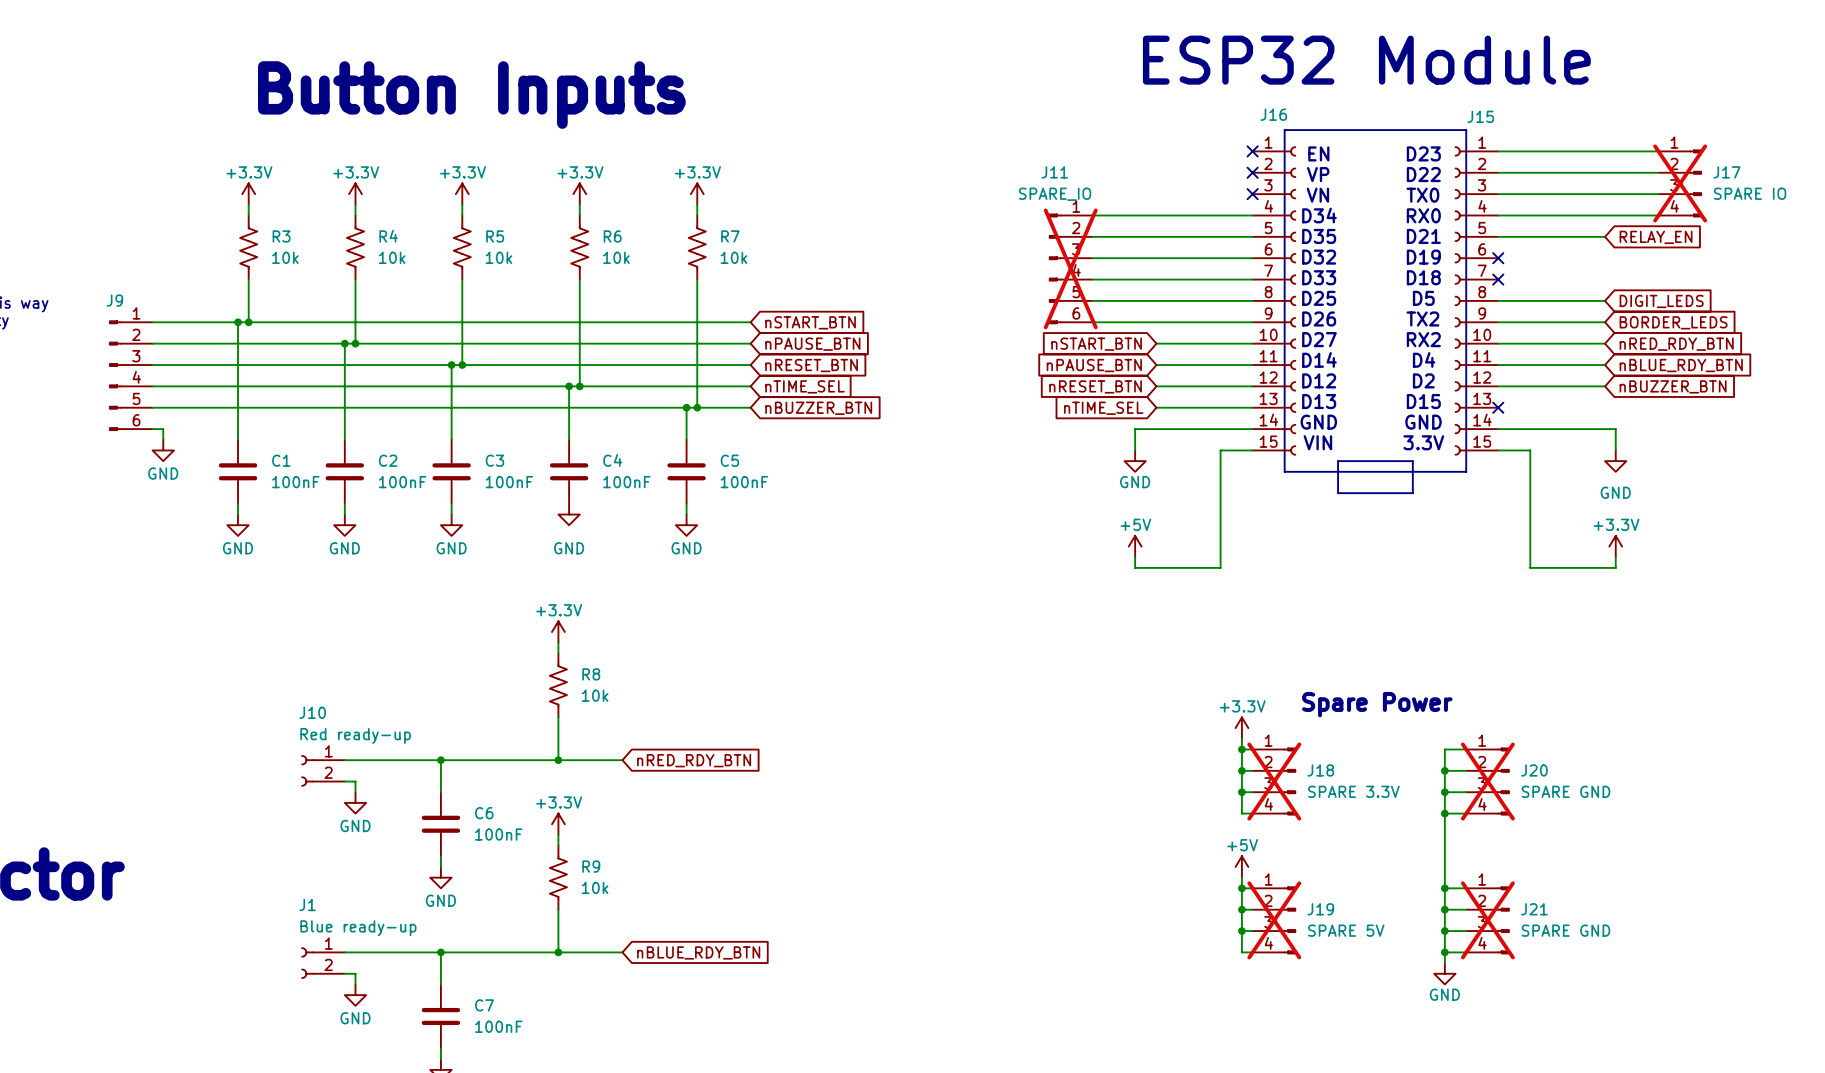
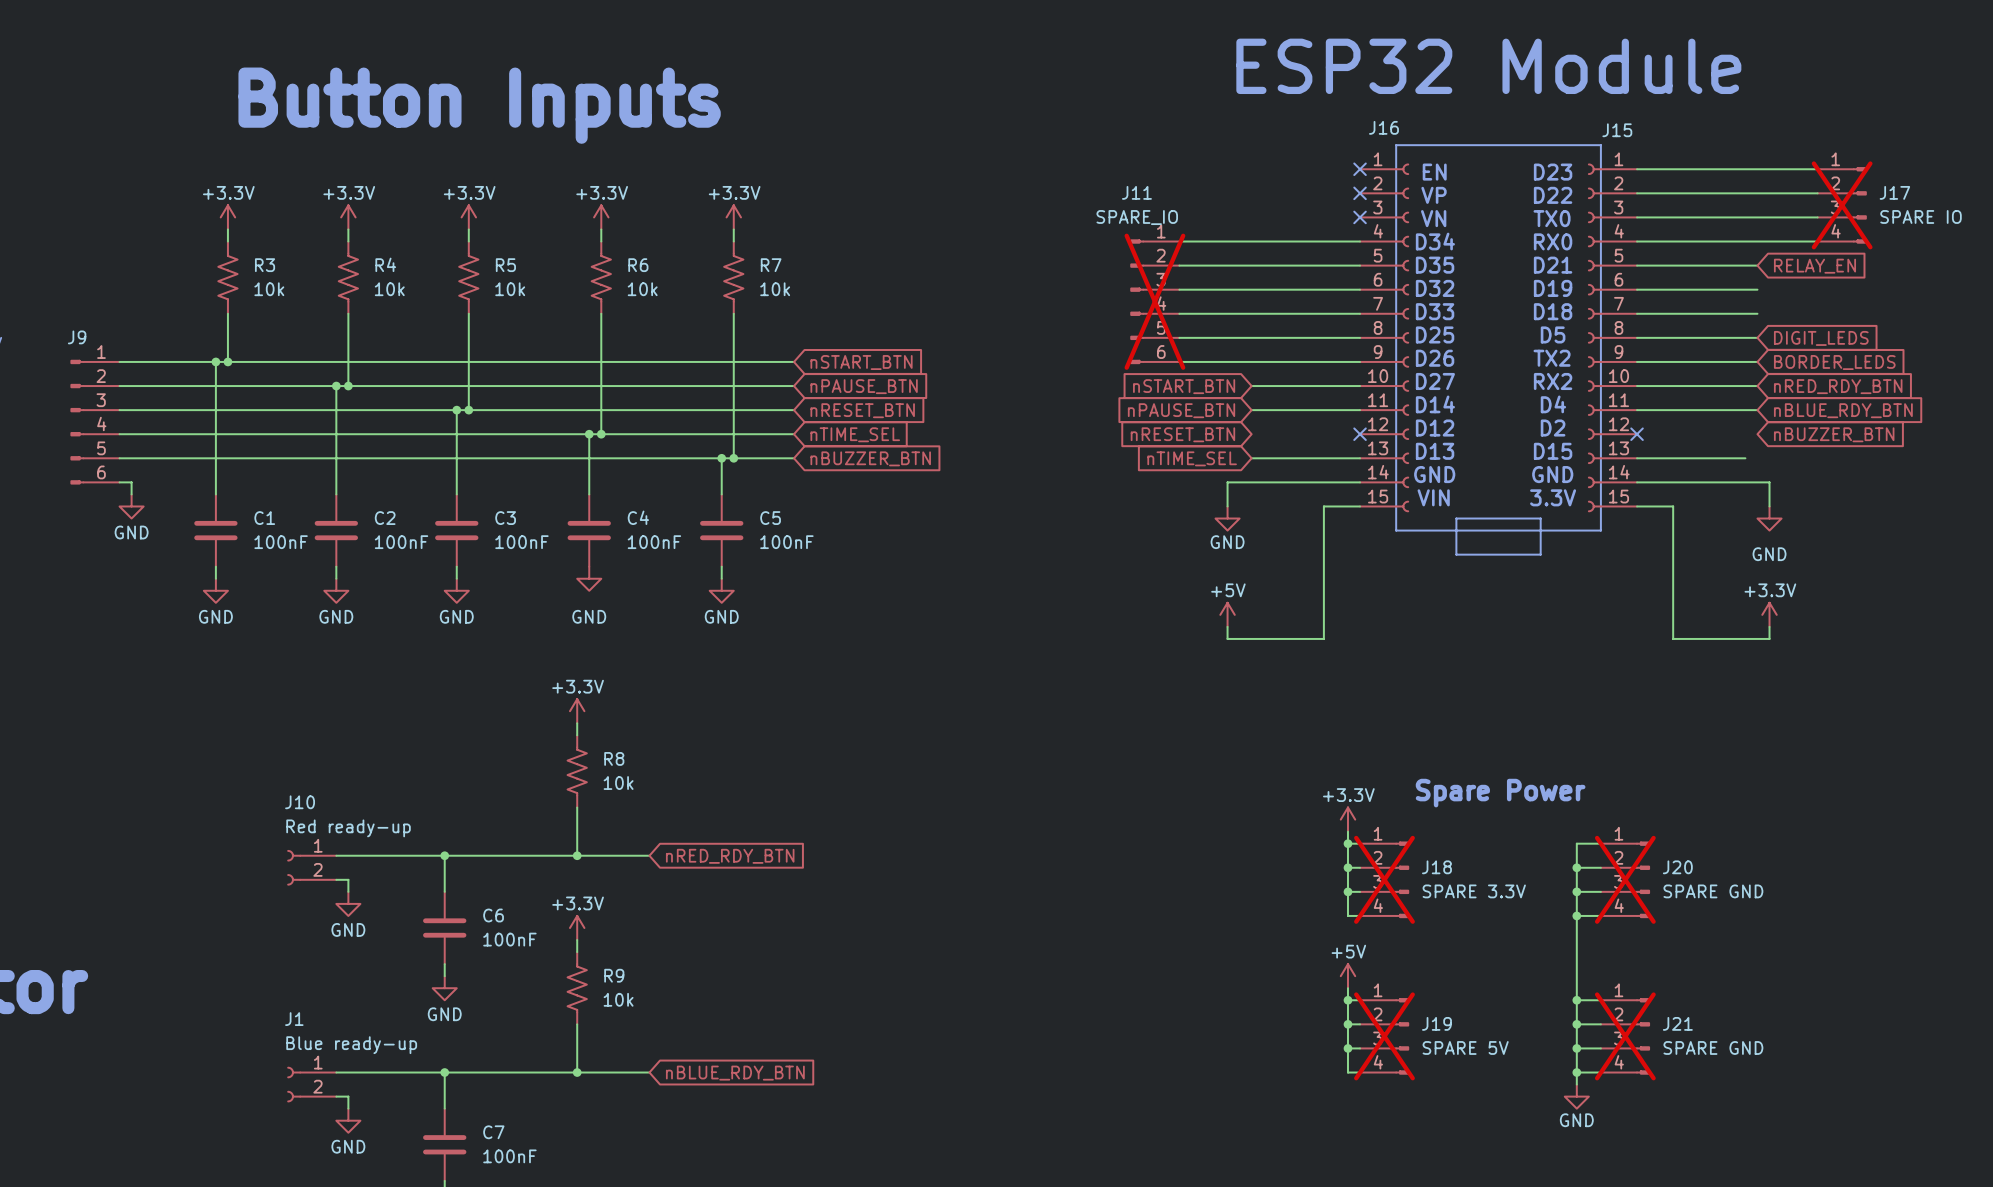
wire: none -> (1637, 289) (1757, 289)
no-connect mark: (1498, 258) -> none
no-connect mark: (1498, 279) -> none
wire: (1156, 386) (1252, 386) -> none
no-connect mark: none -> (1360, 434)
wire: (1498, 386) (1605, 386) -> (1637, 313) (1757, 313)
wire: none -> (1637, 458) (1745, 458)
no-connect mark position: (1498, 407) -> (1637, 434)

